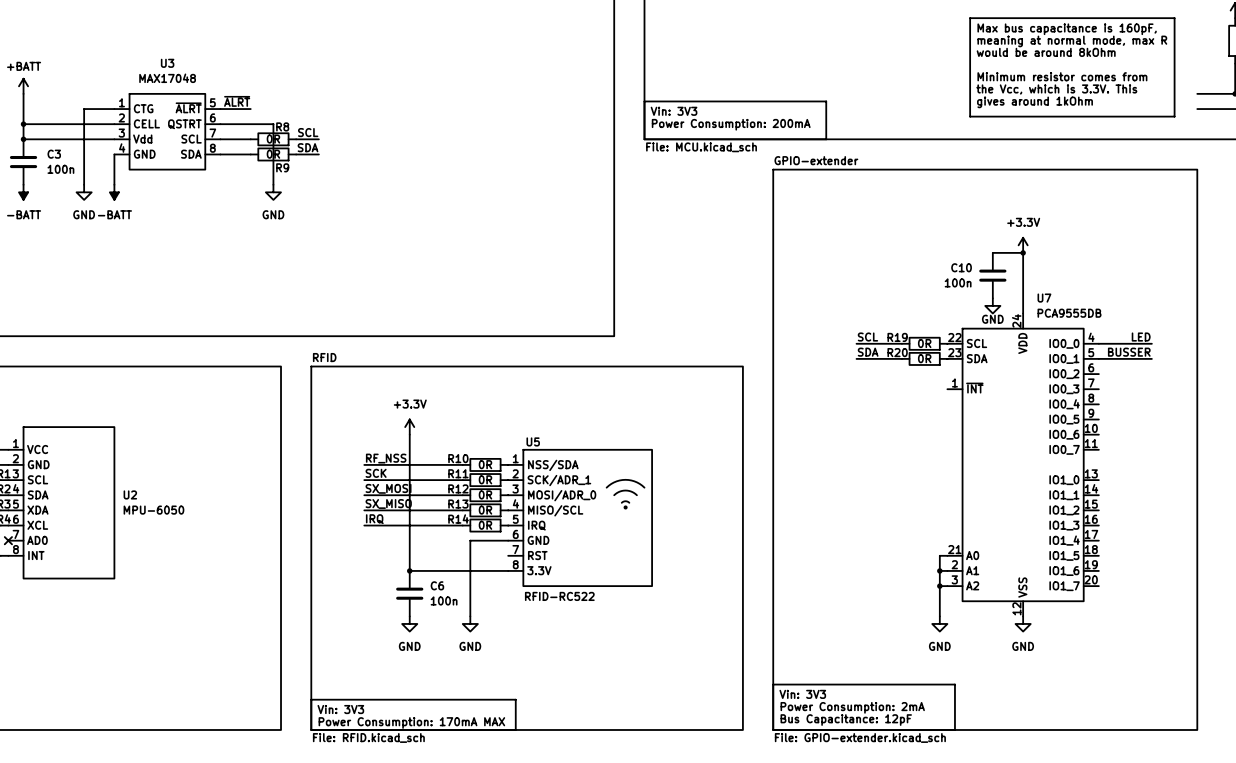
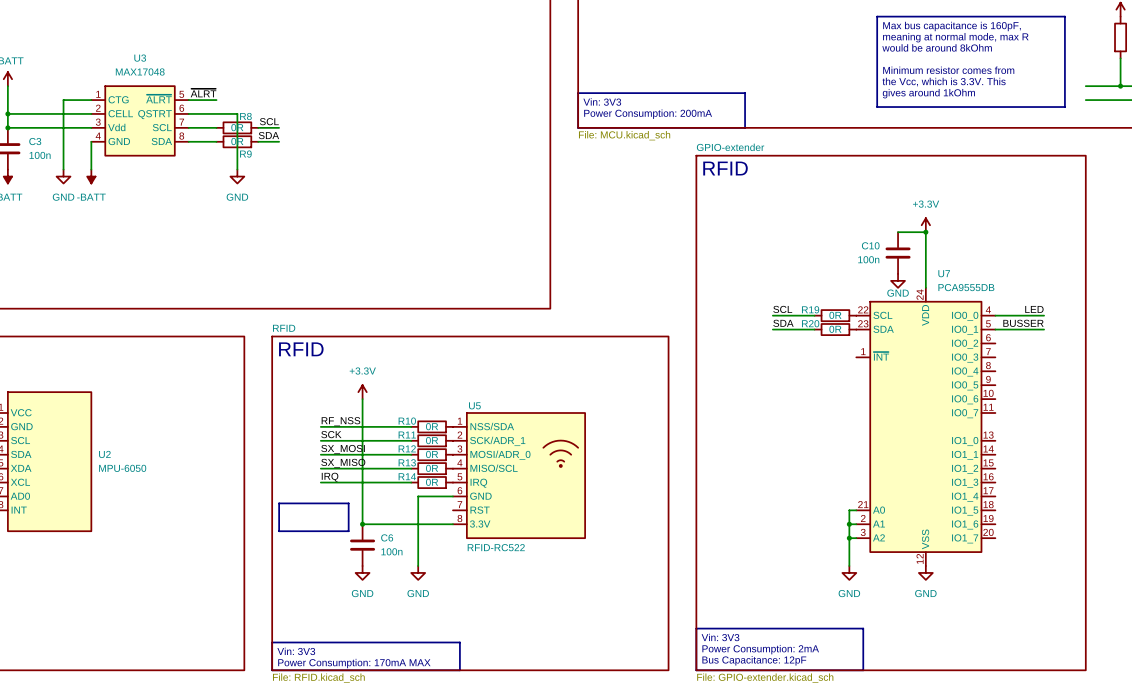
text: none -> RFID (725, 168)
text: none -> RFID (301, 349)
line: none -> (279, 503) (348, 503) (348, 531) (279, 531) (279, 503)

